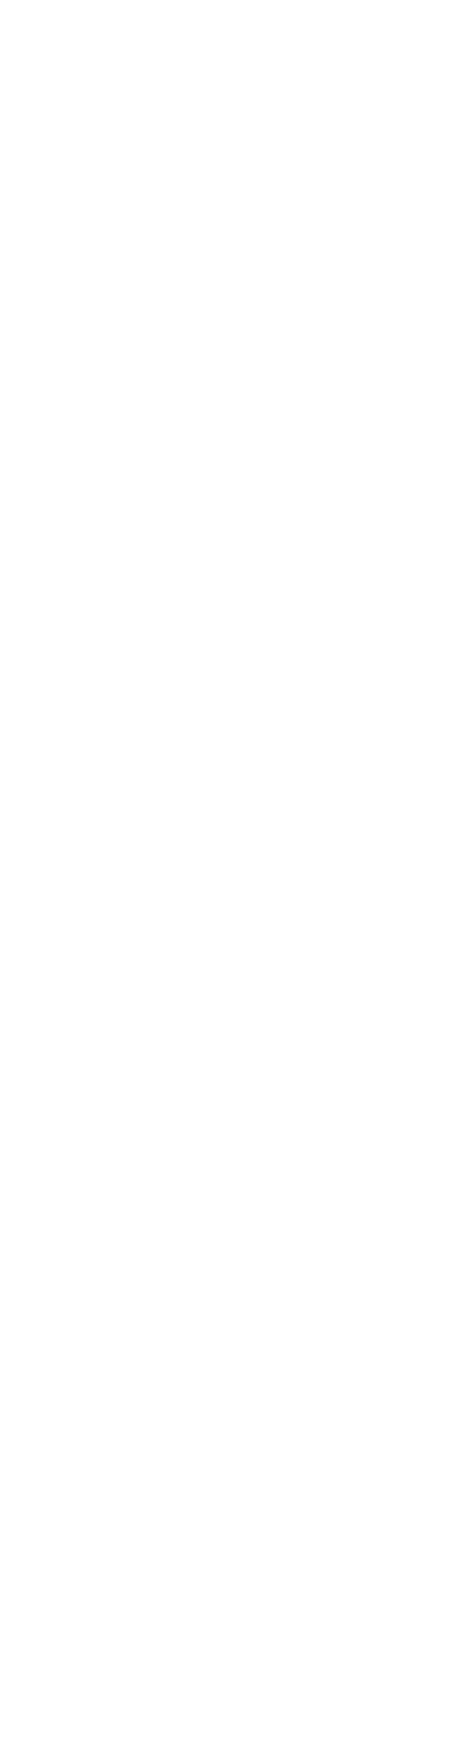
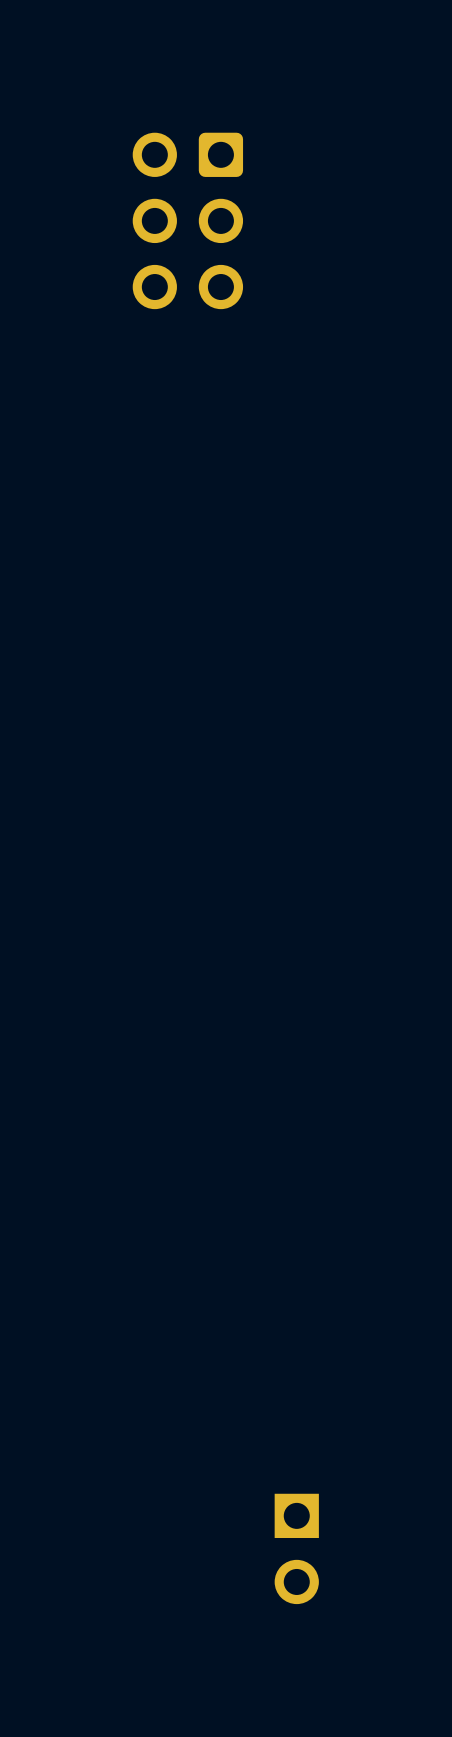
part: none -> (187, 220)
part: none -> (296, 1548)

